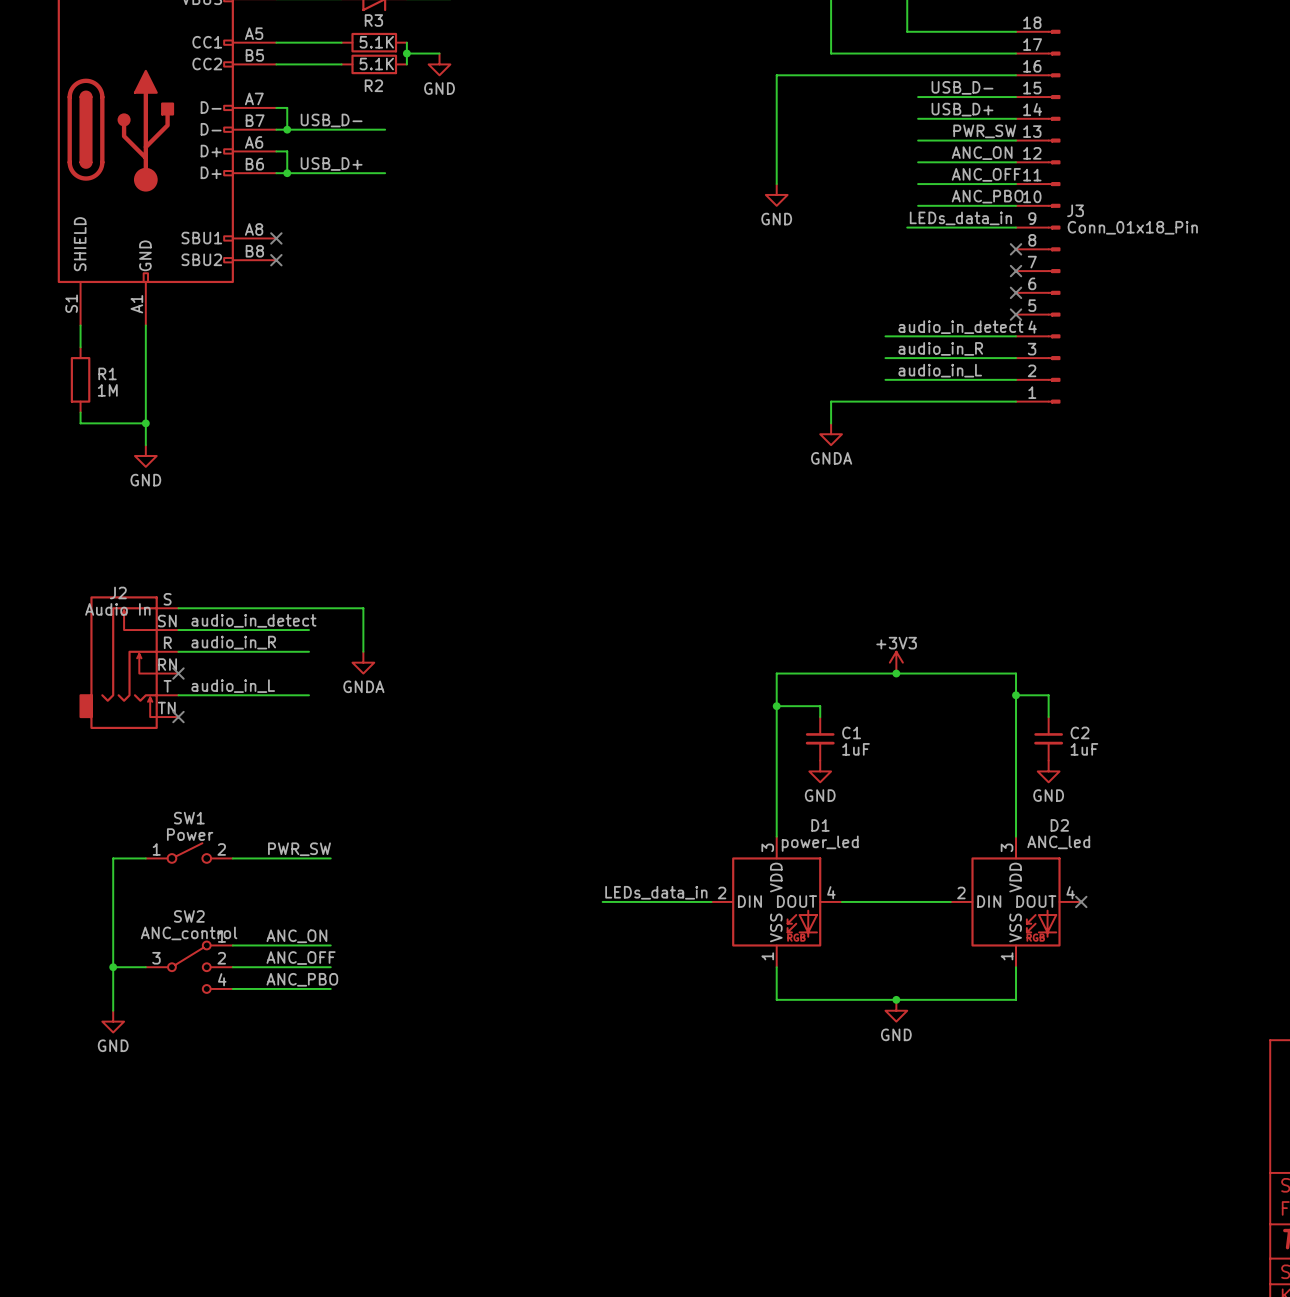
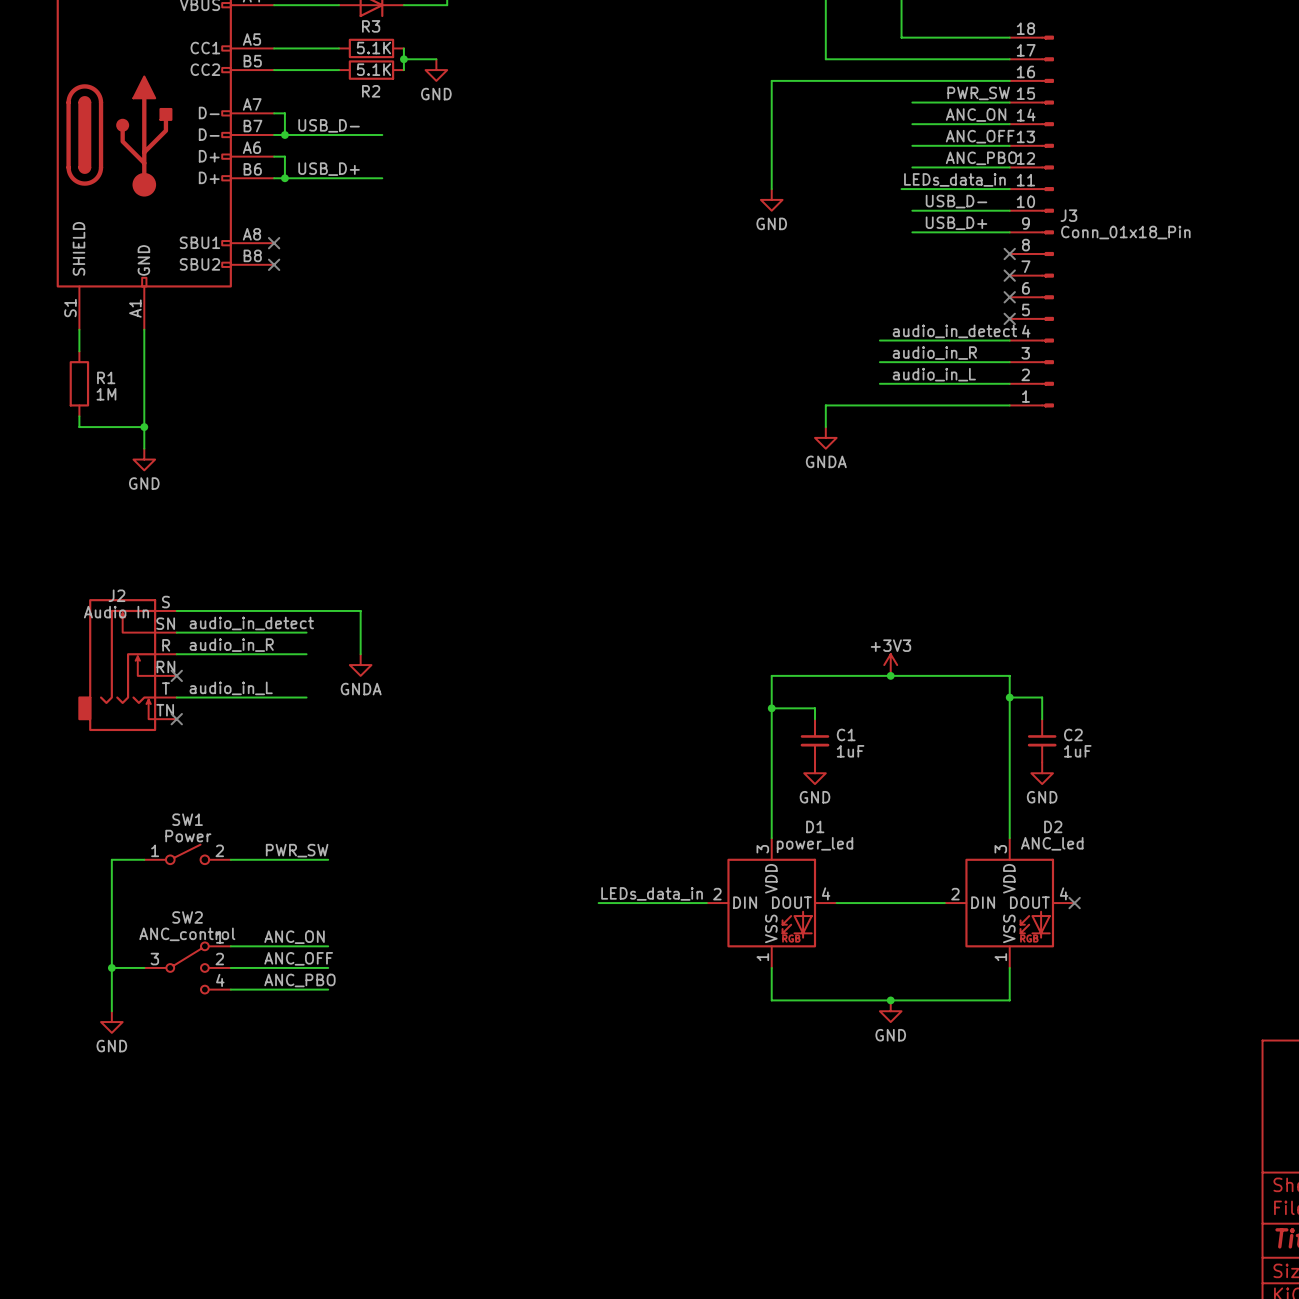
label position: USB_D- (962, 87) -> USB_D- (956, 201)
label: none -> PWR_SW (978, 93)
label position: USB_D+ (962, 109) -> USB_D+ (956, 223)
label: none -> ANC_ON (976, 115)
label: PWR_SW (984, 131) -> ANC_OFF (980, 136)
label: ANC_ON (982, 153) -> ANC_PBO (981, 158)
label: ANC_OFF (986, 174) -> none
label: ANC_PBO (987, 196) -> none
label position: LEDs_data_in (960, 218) -> LEDs_data_in (954, 179)
wire: (907, 227) (918, 227) -> (901, 189) (912, 189)

